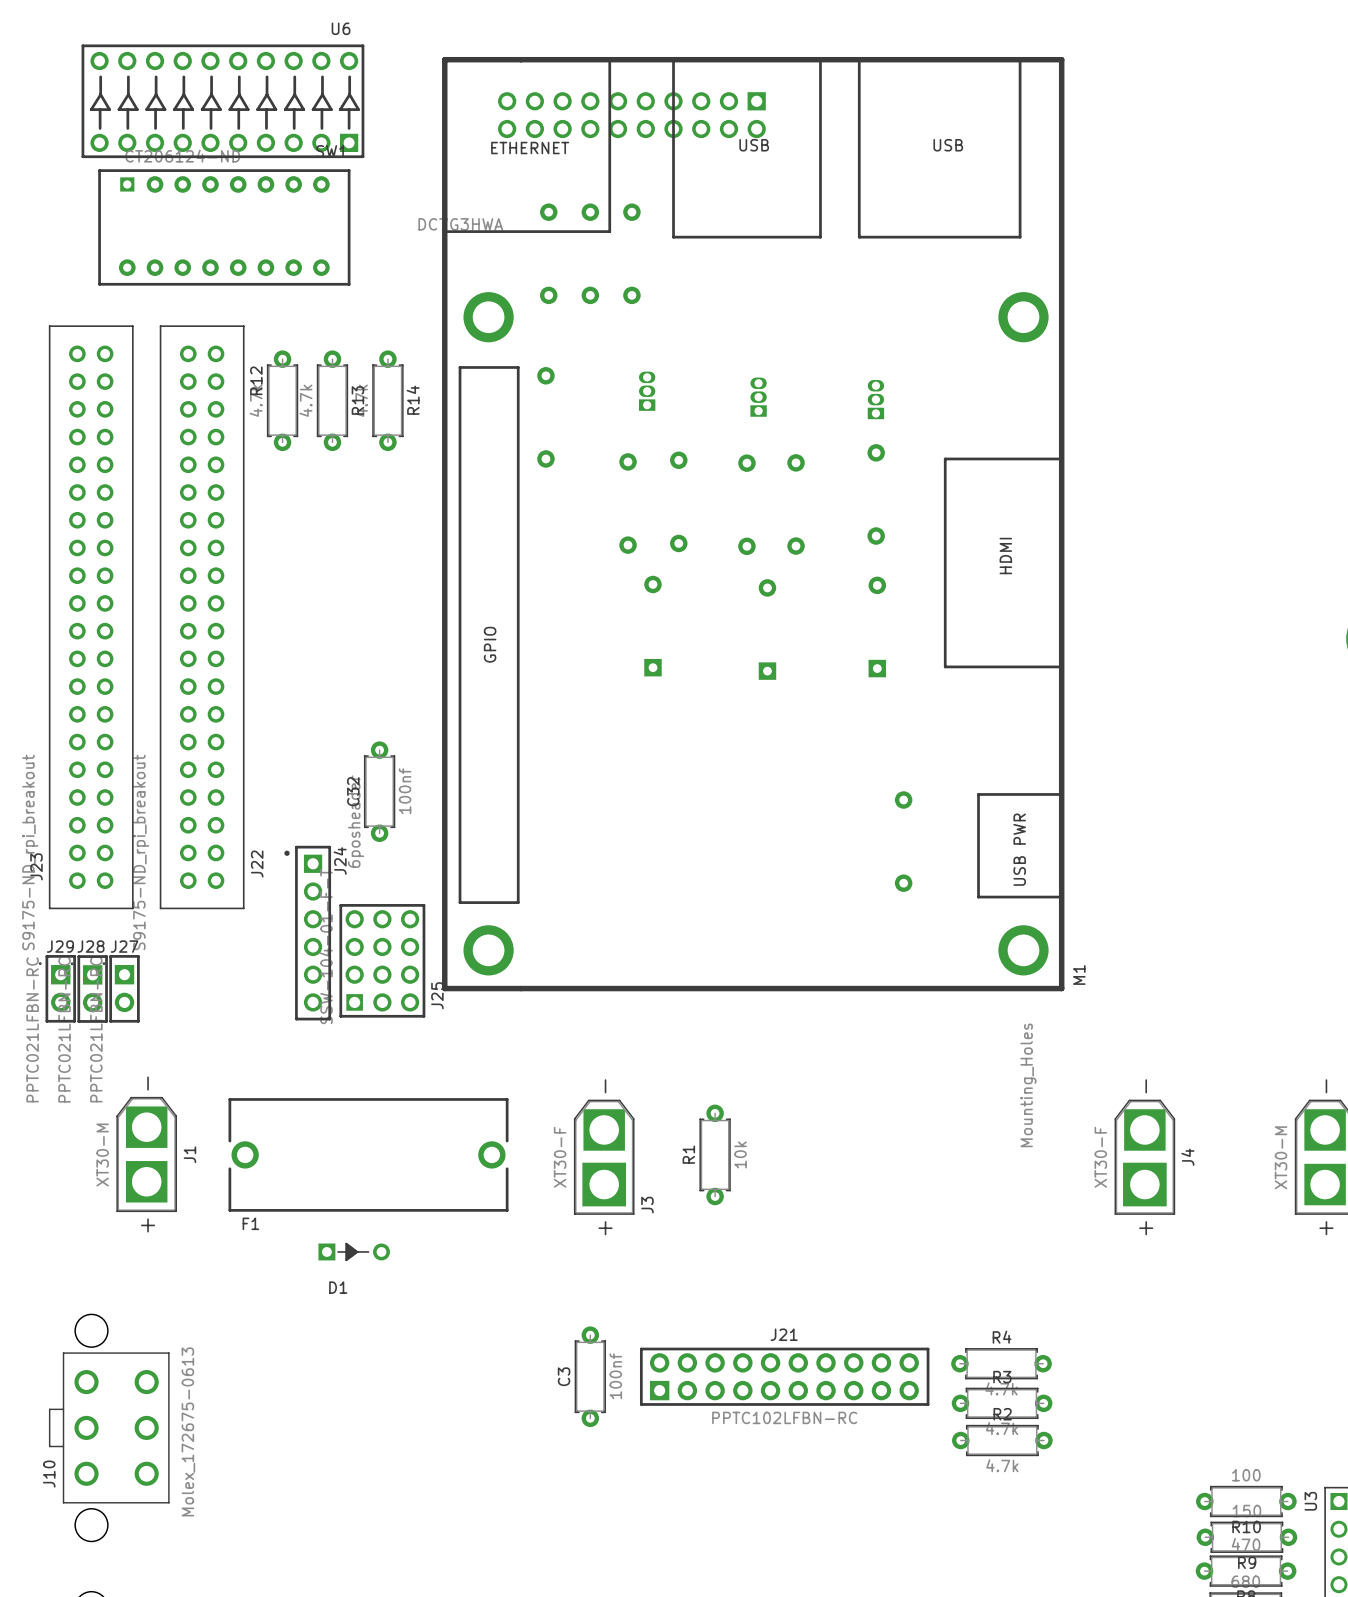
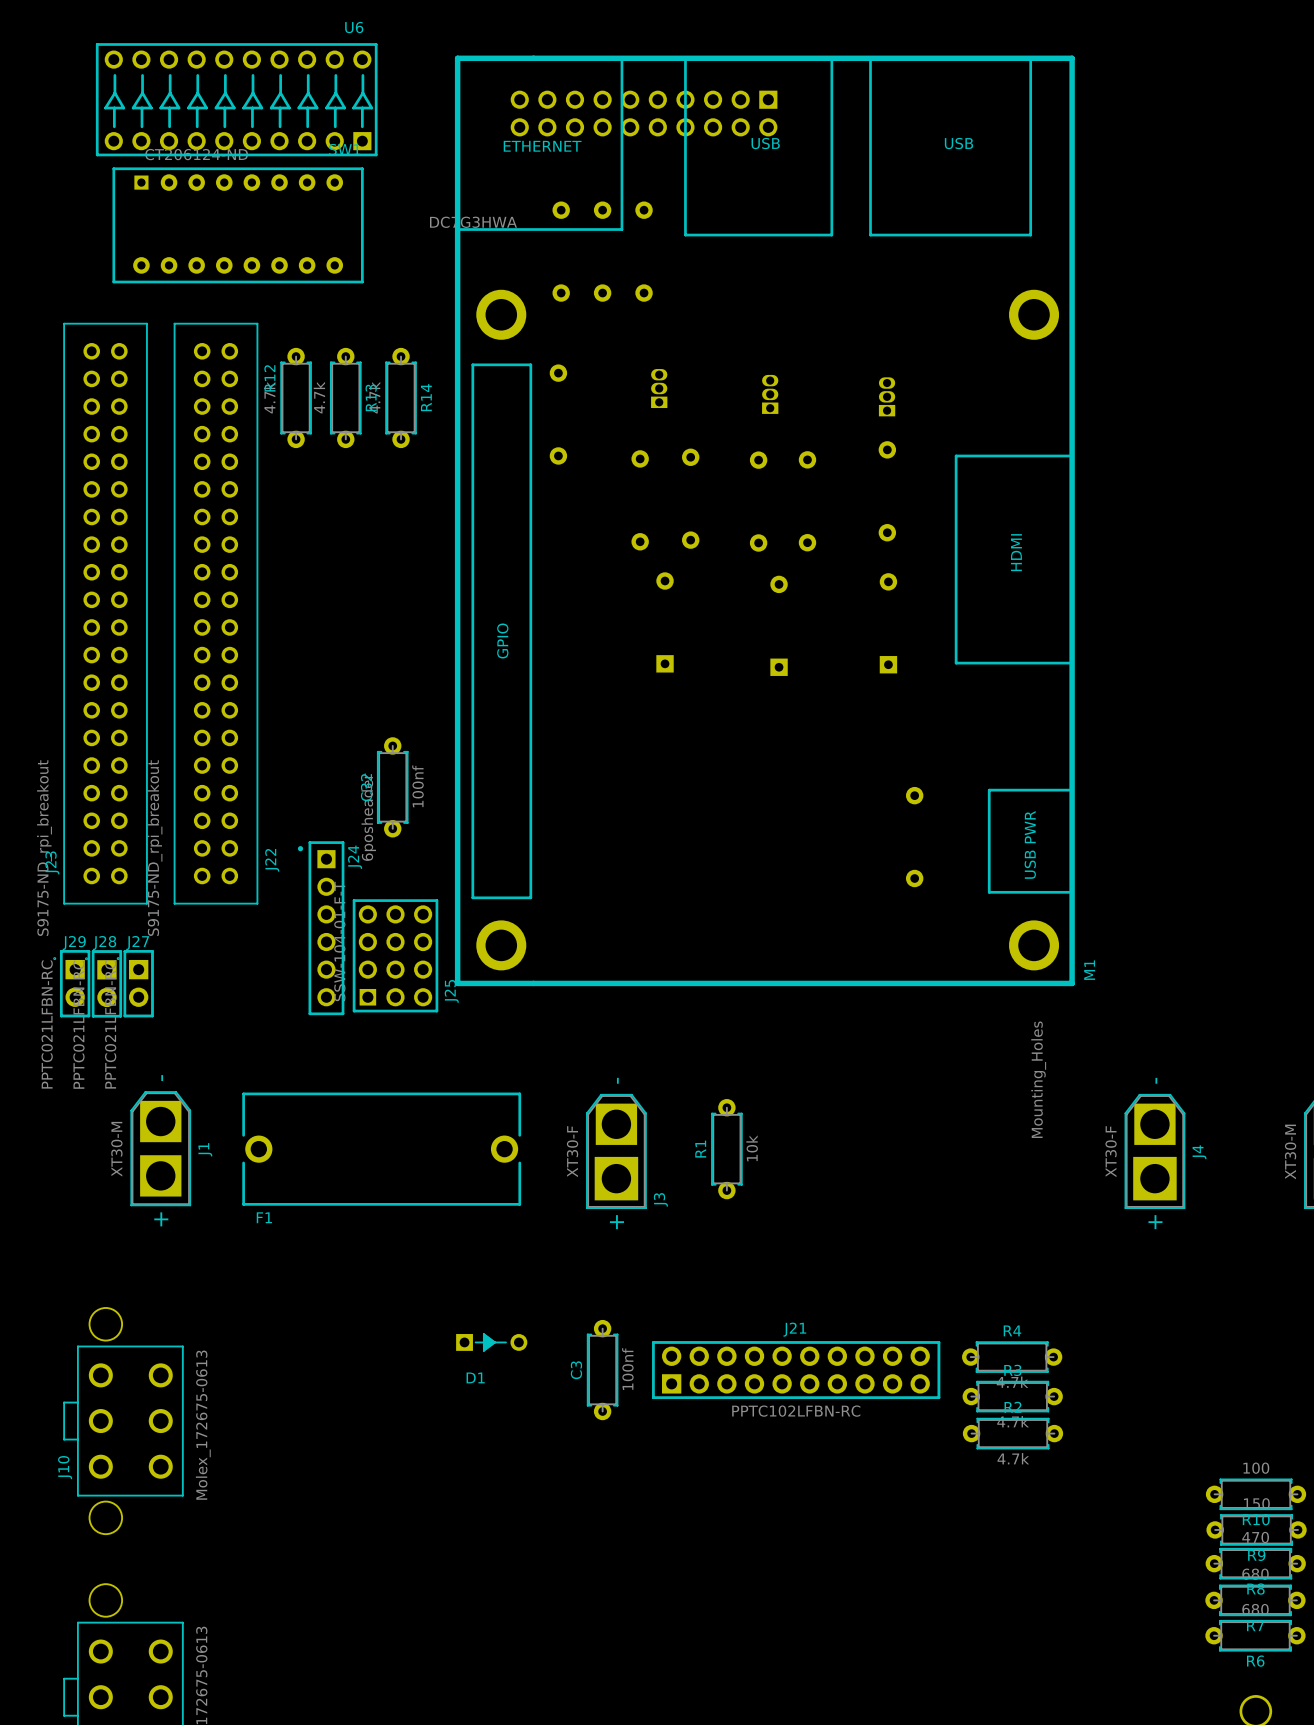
D1 position: (354, 1251) -> (491, 1342)

